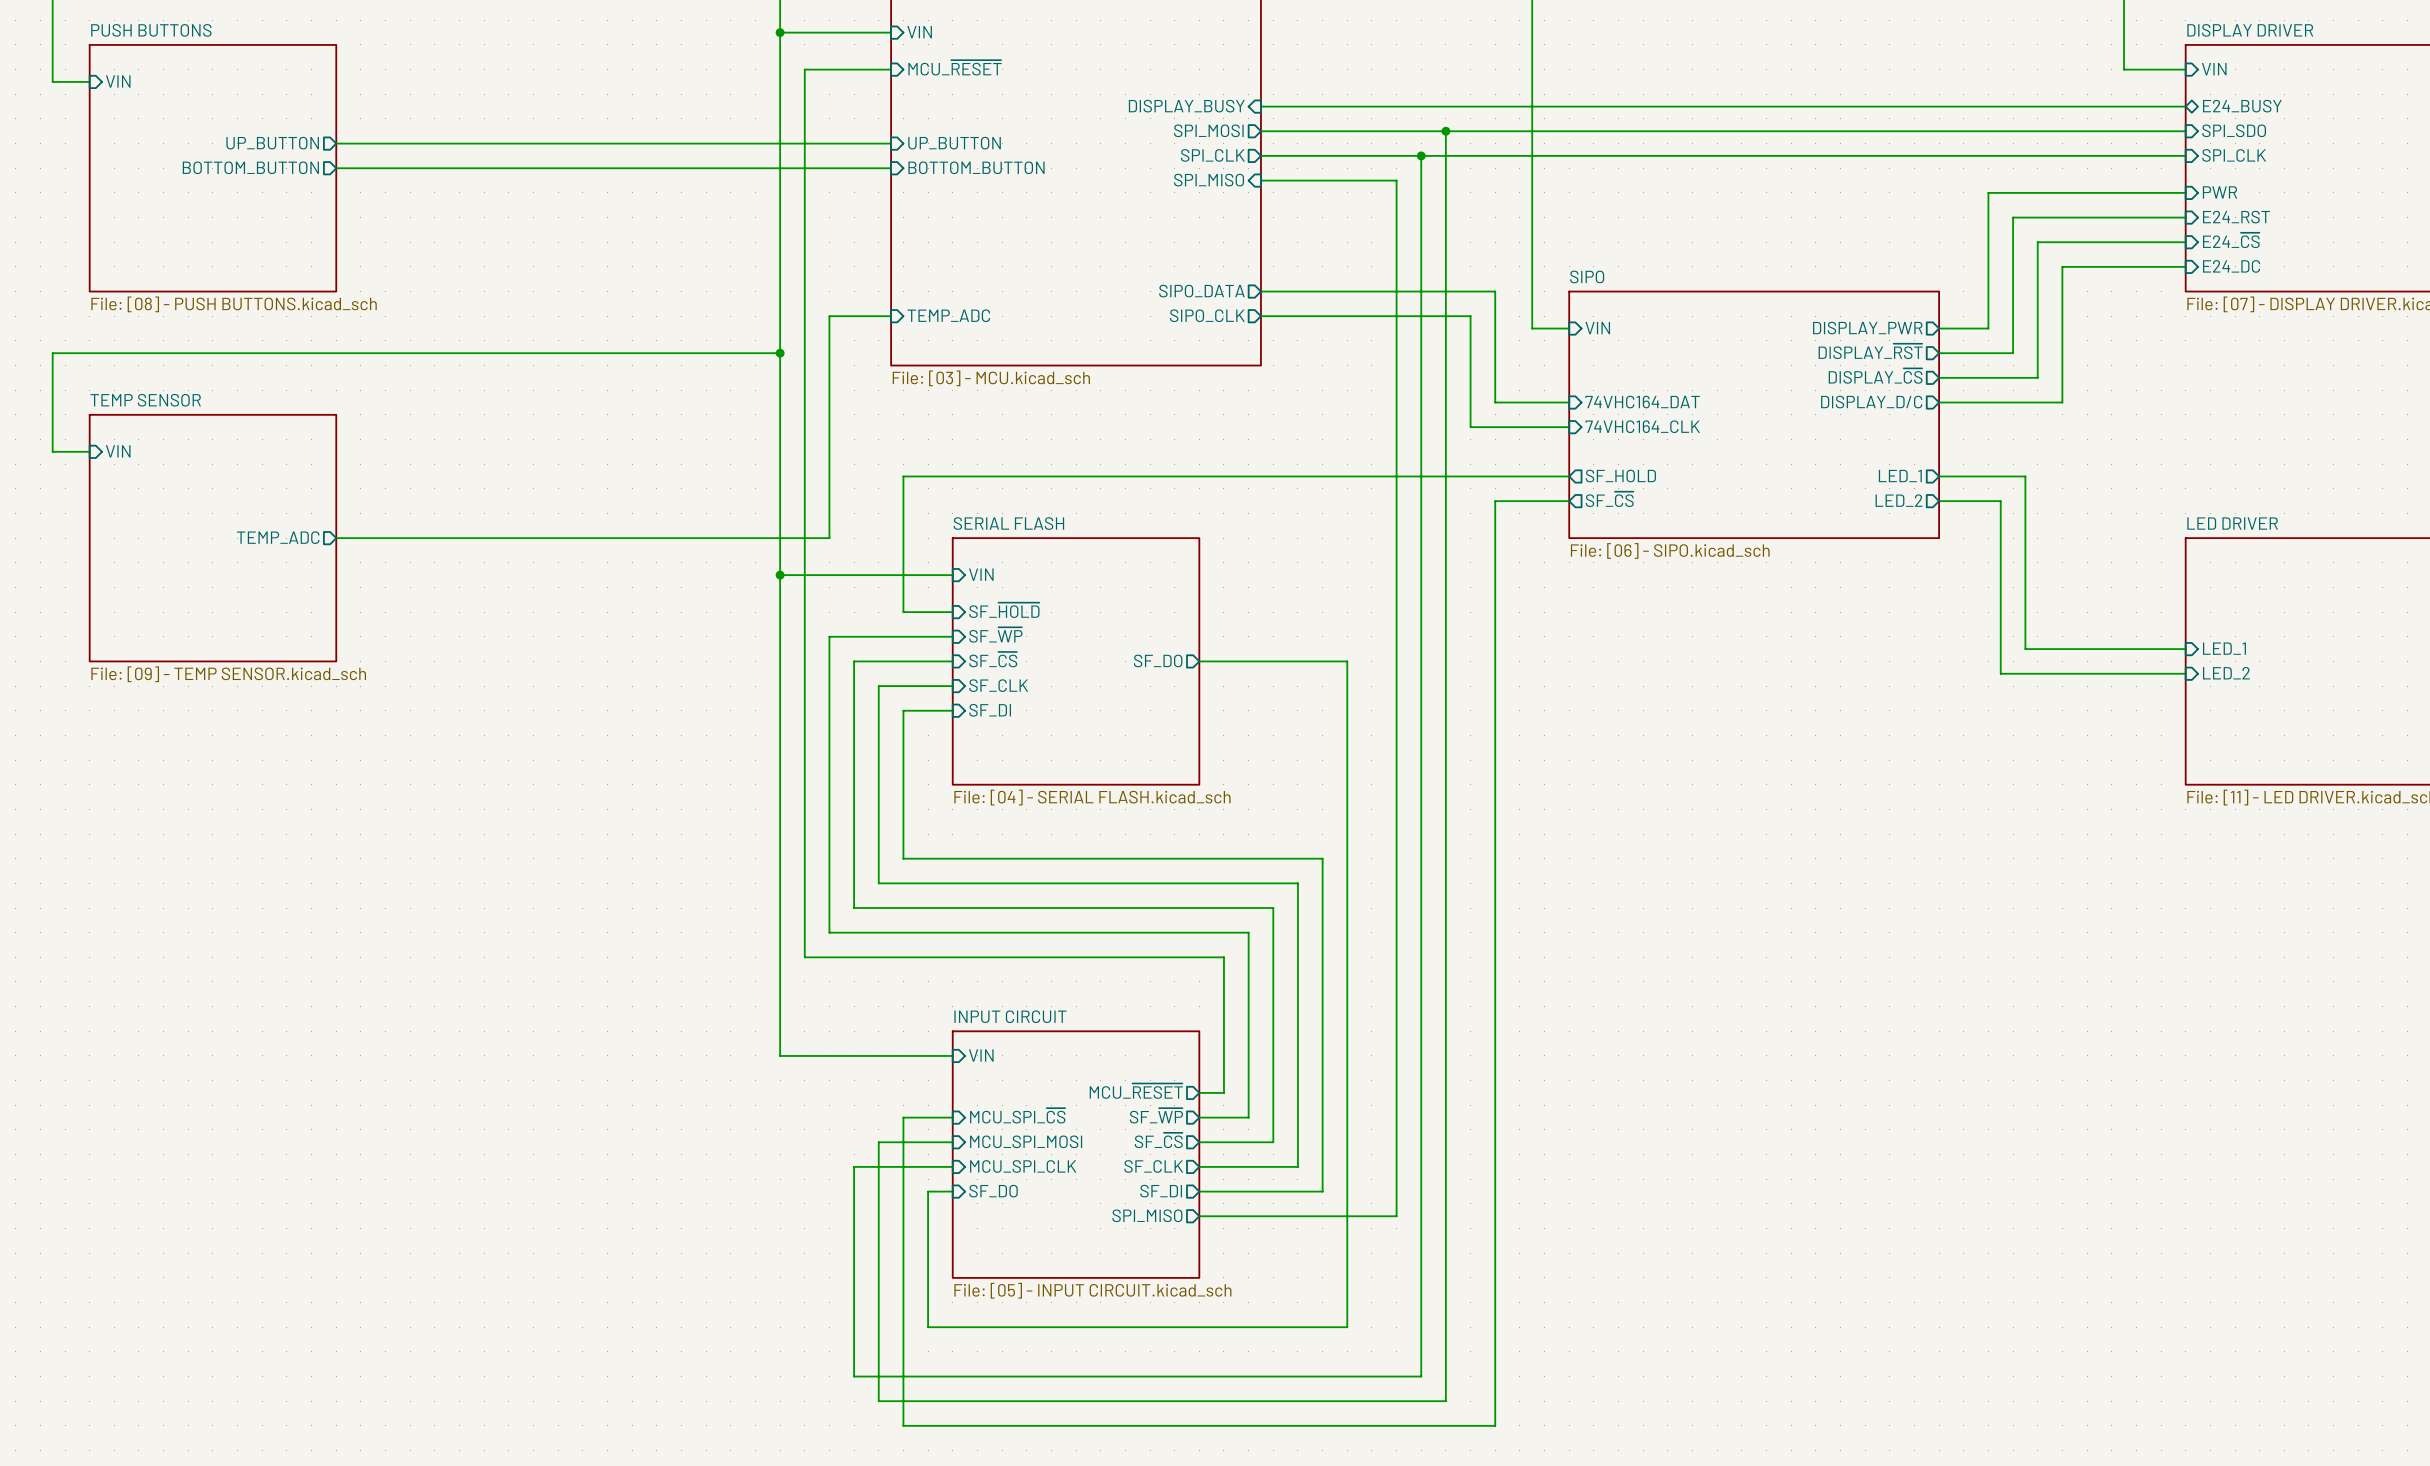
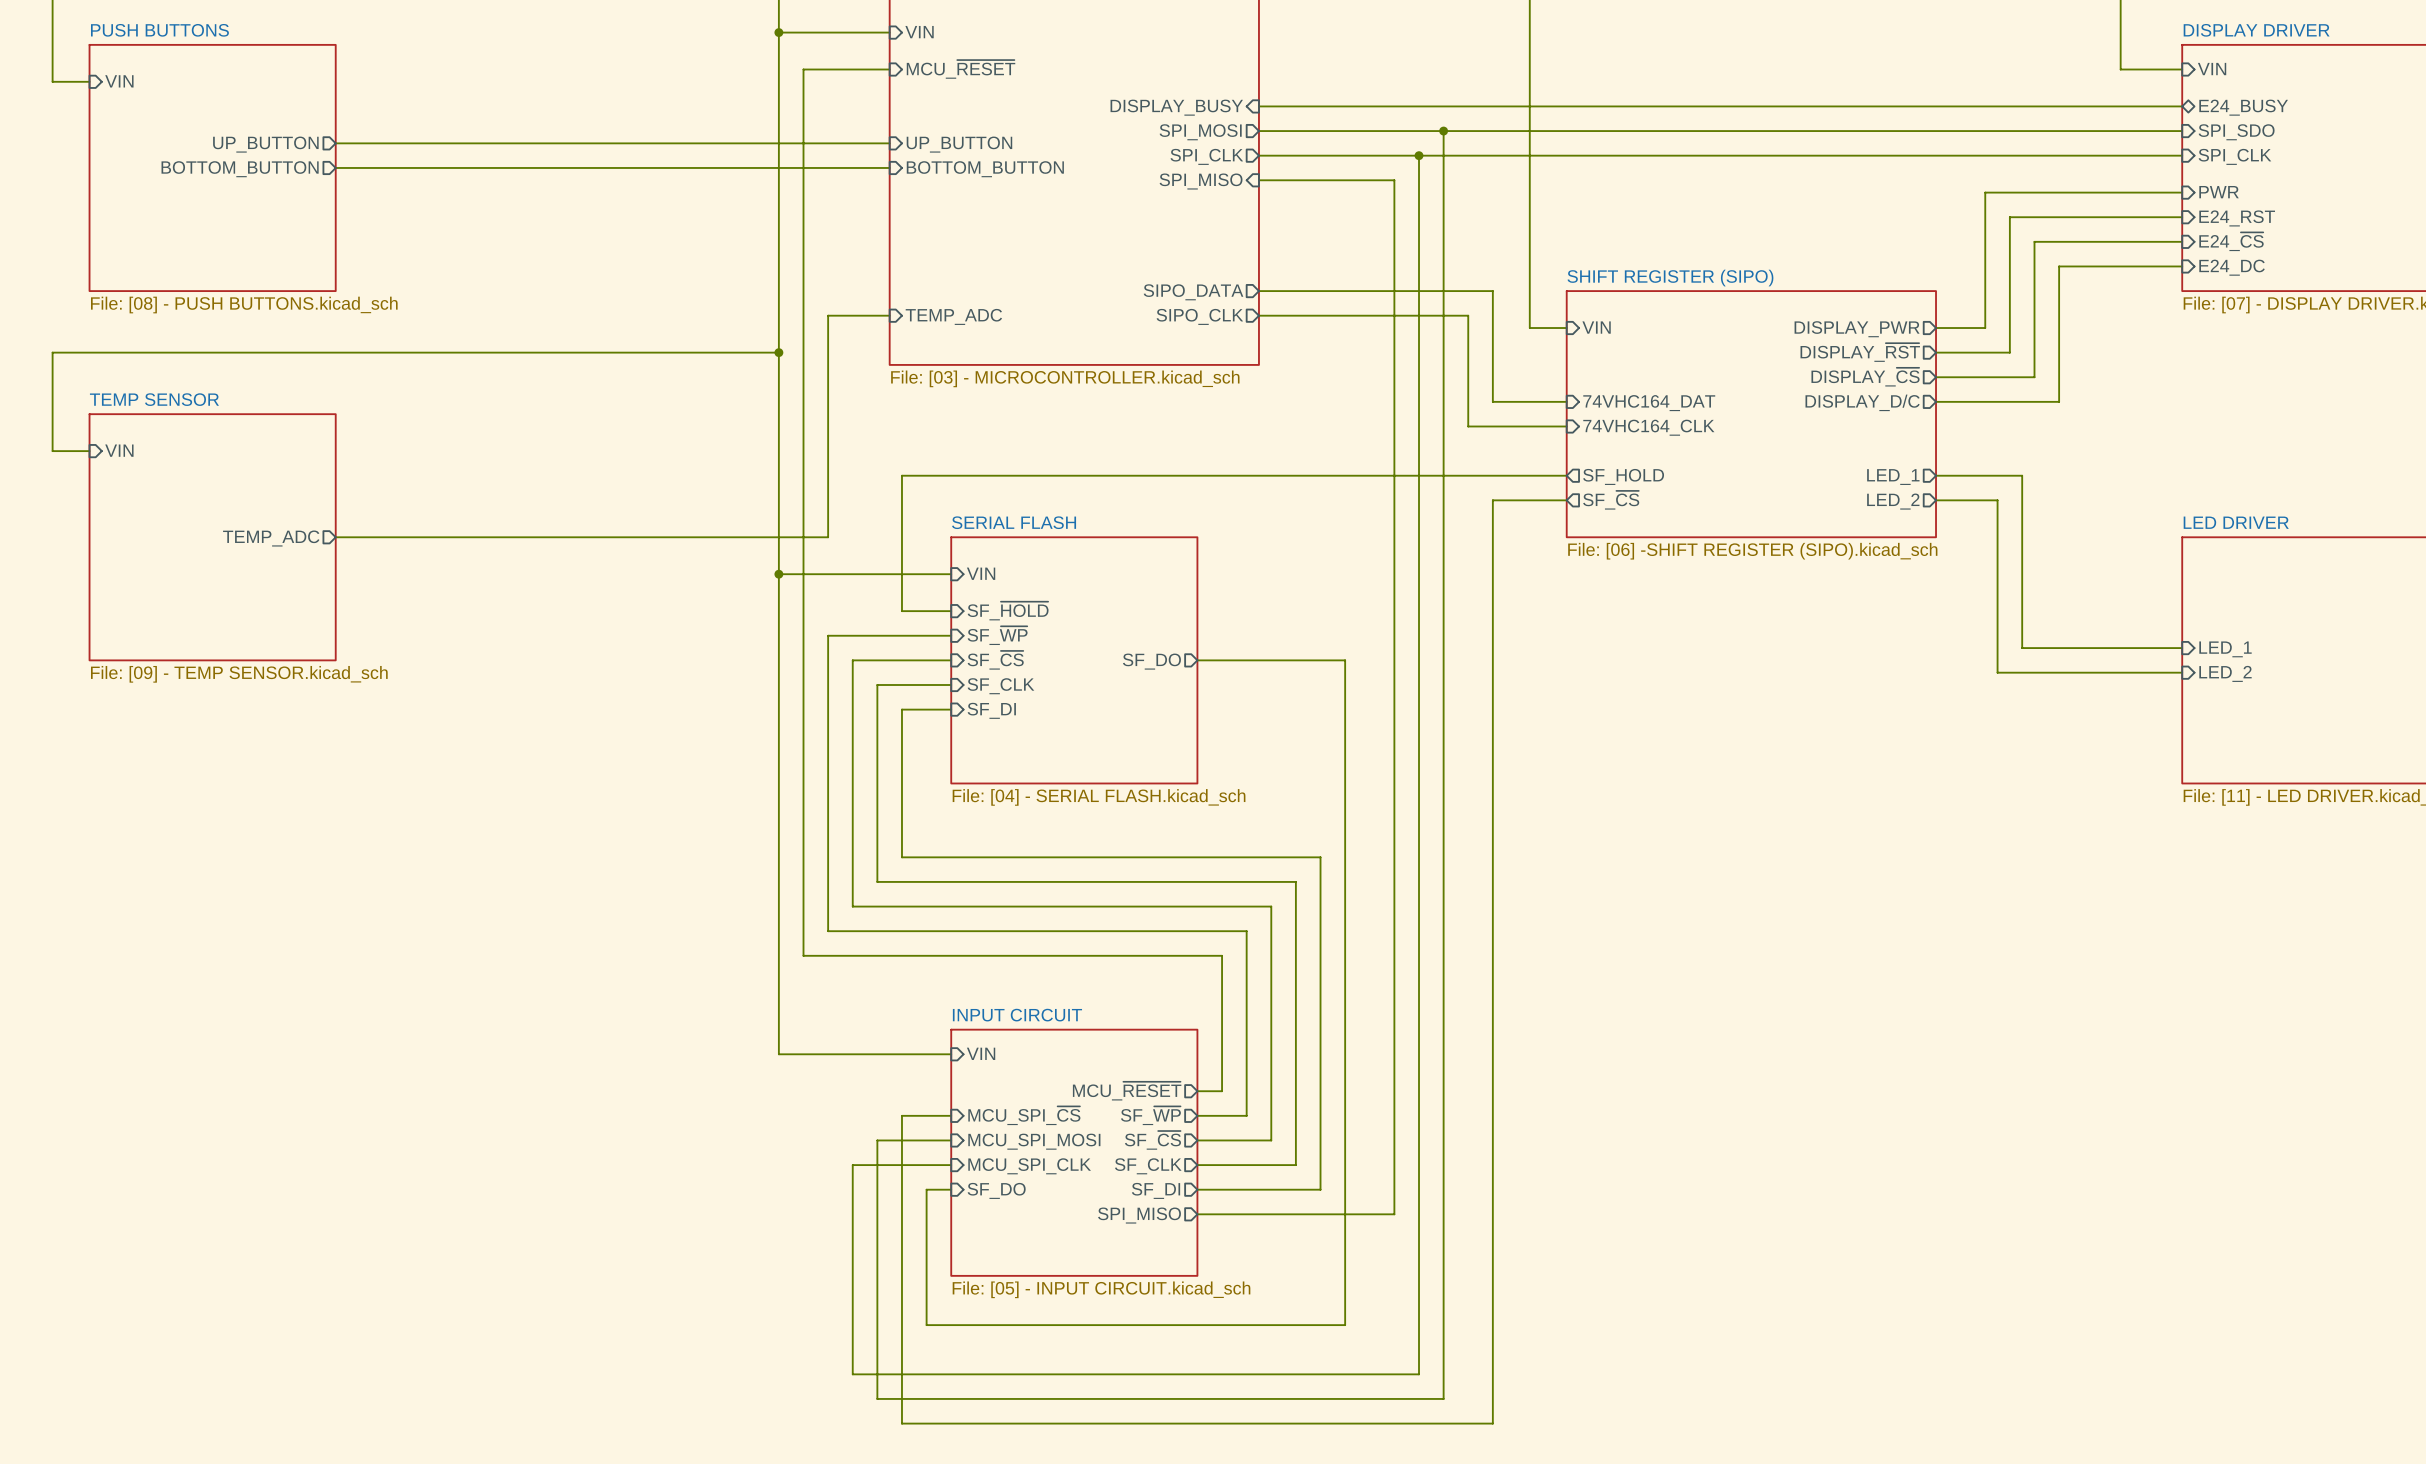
sheet SIPO name: SIPO (1587, 276) -> SHIFT REGISTER (SIPO) (1670, 278)
sheet value: File: [03] - MCU.kicad_sch (991, 378) -> File: [03] - MICROCONTROLLER.kicad_sch (1065, 378)
sheet SIPO value: File: [06] - SIPO.kicad_sch (1670, 550) -> File: [06] -SHIFT REGISTER (SIPO).kicad_sch (1752, 551)

